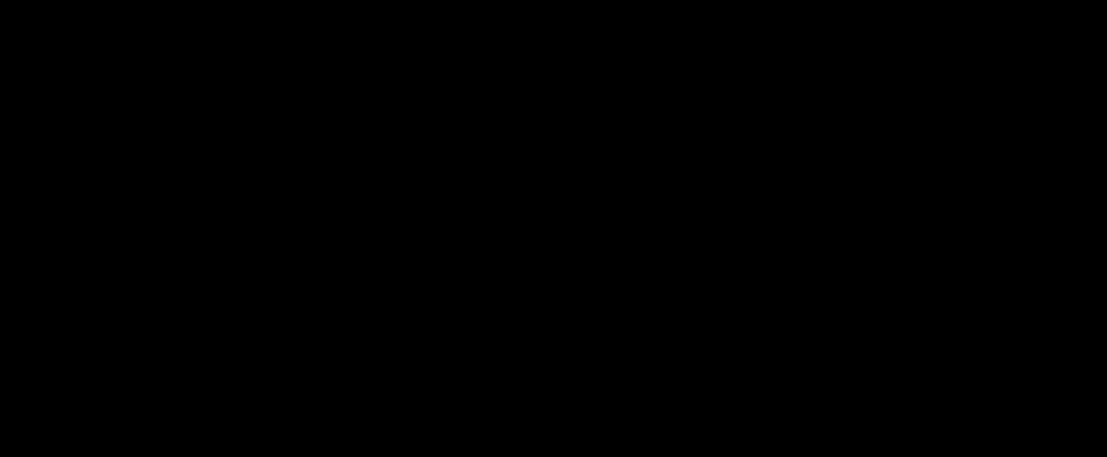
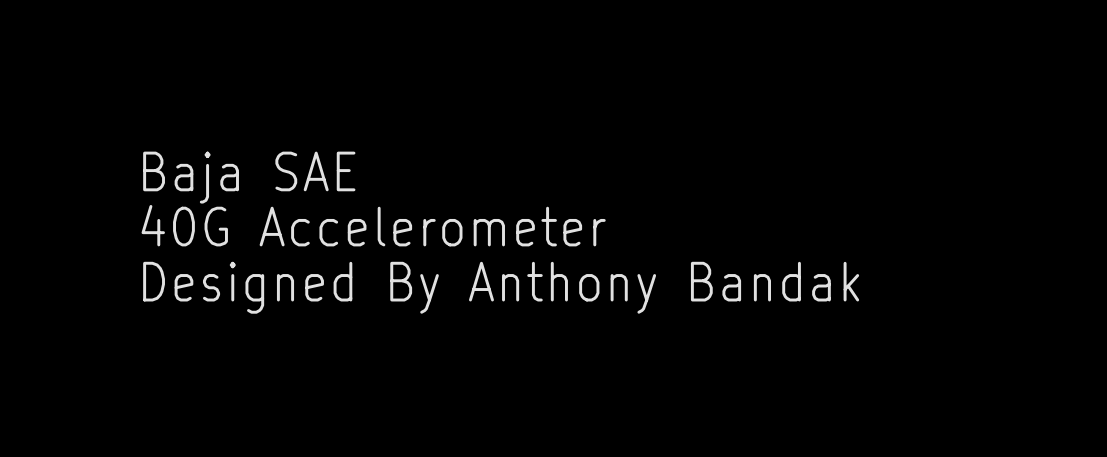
text: none -> Baja SAE (249, 177)
text: none -> 40G Accelerometer (373, 225)
text: none -> Designed By Anthony Bandak (501, 287)

